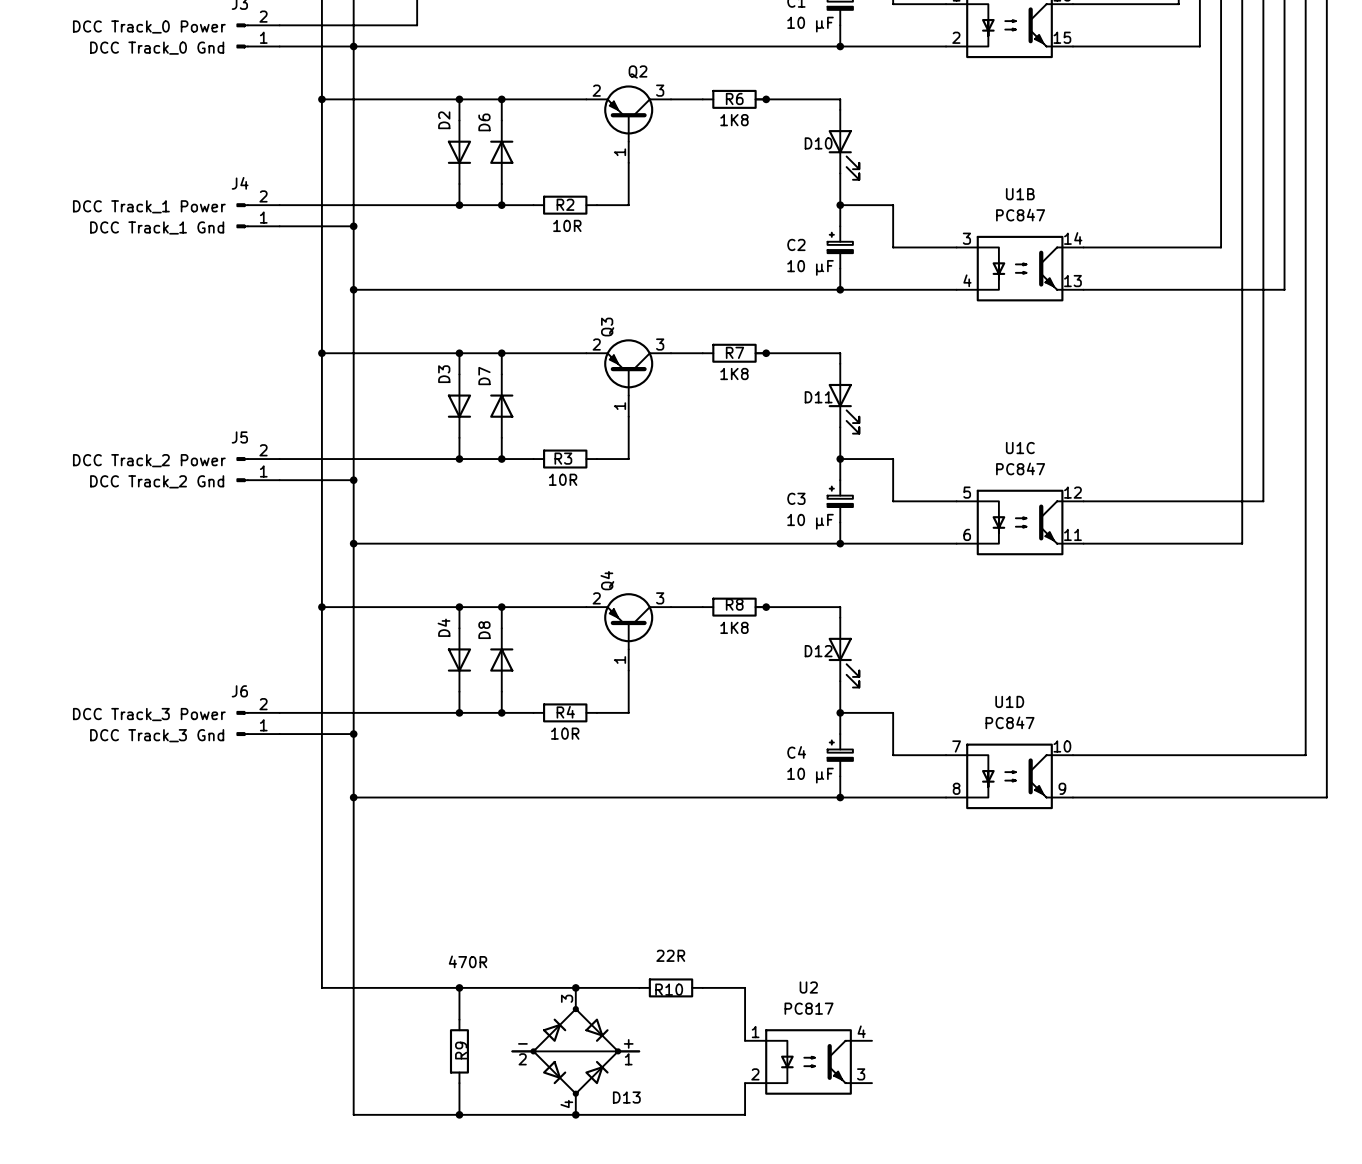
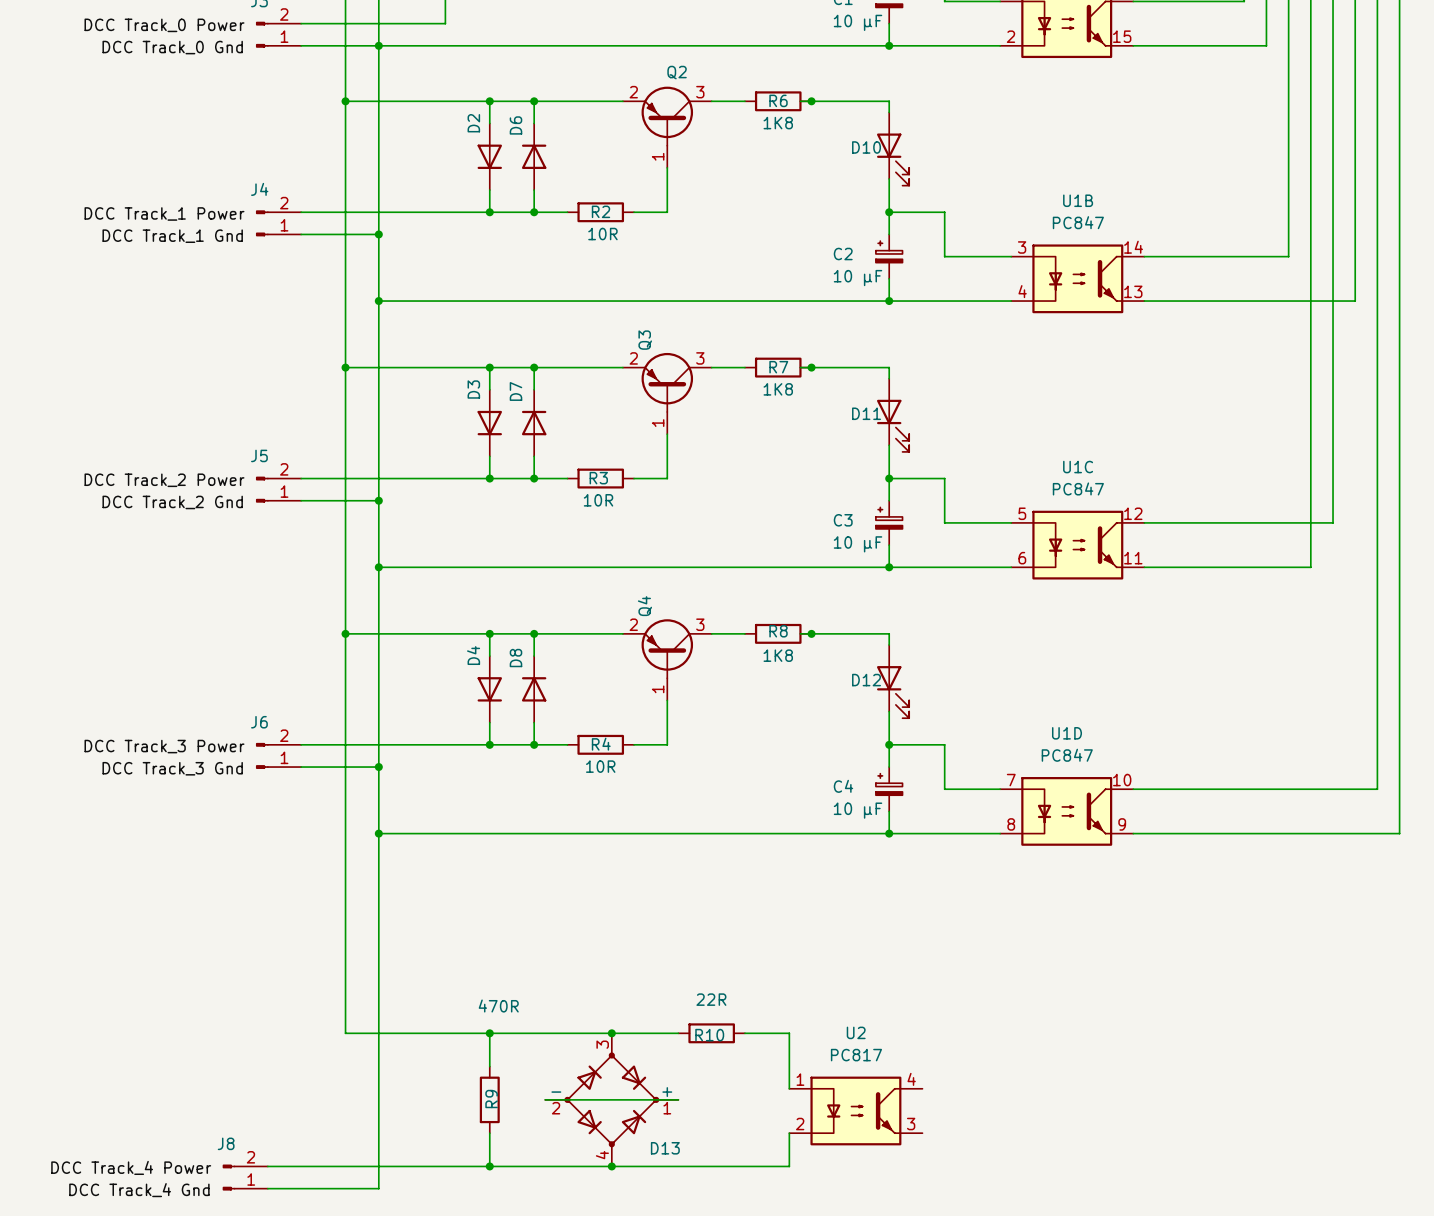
wire: none -> (267, 1166) (378, 1166) (378, 1188) (267, 1188)
label: none -> DCC Track_4 Power (131, 1167)
J8: none -> (245, 1177)
label: none -> DCC Track_4 Gnd (139, 1190)

